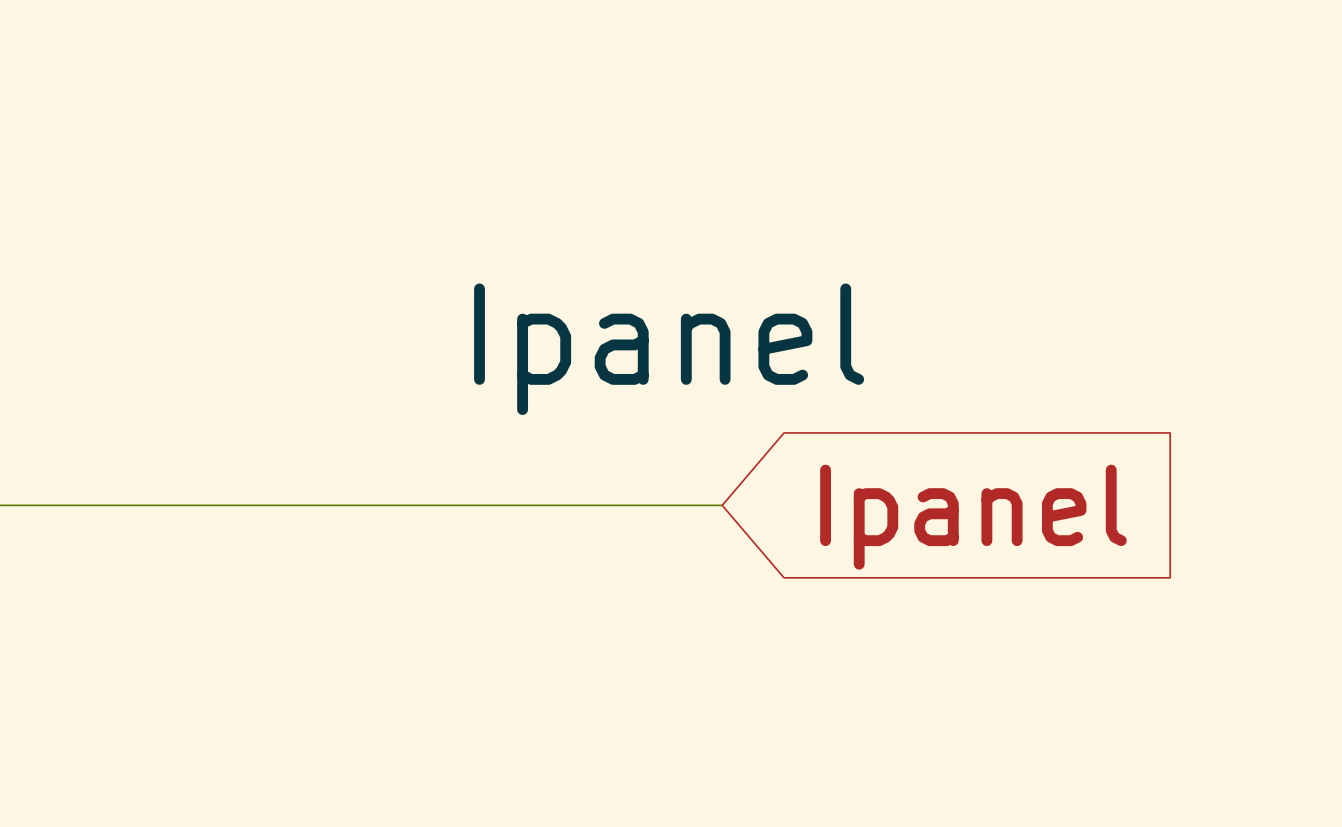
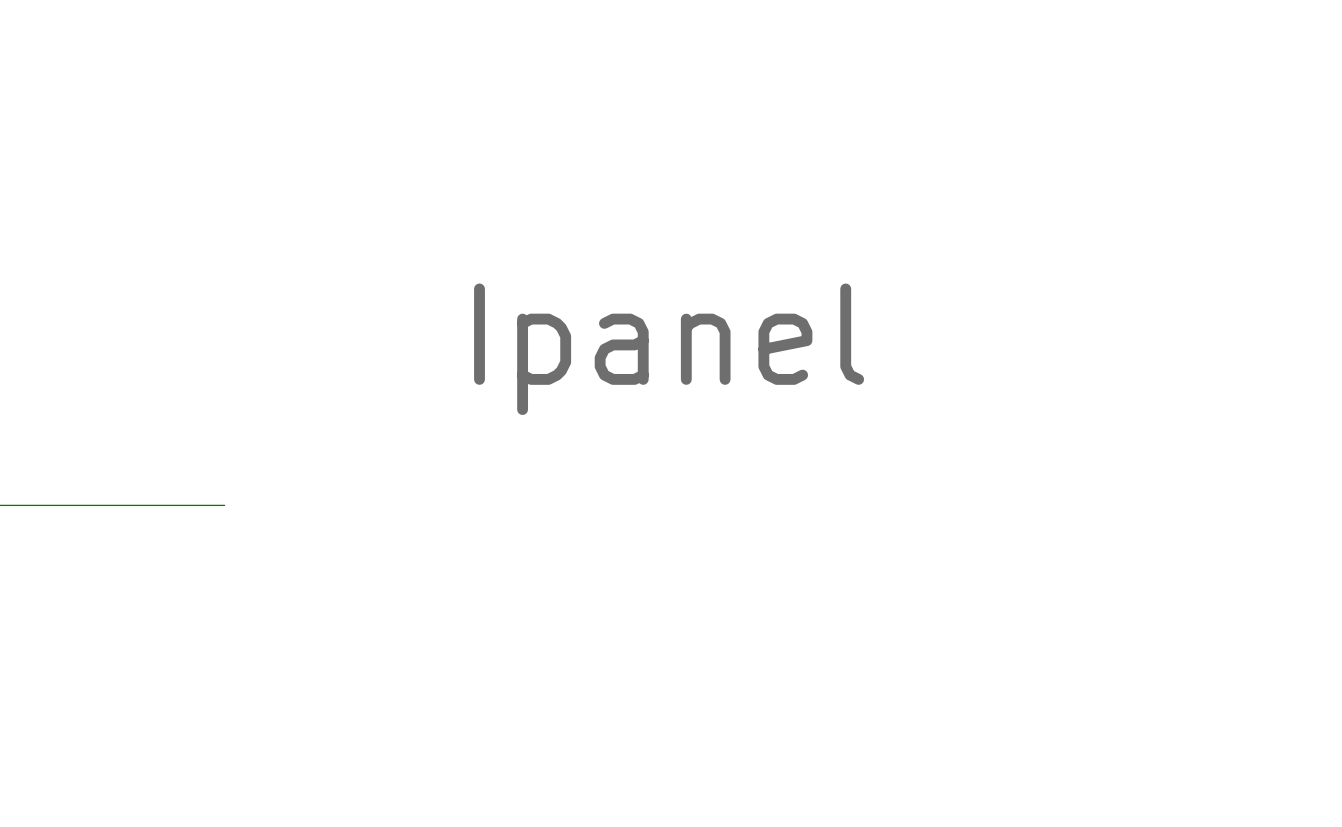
wire: (224, 505) (722, 505) -> none
global label: Ipanel (973, 517) -> none

